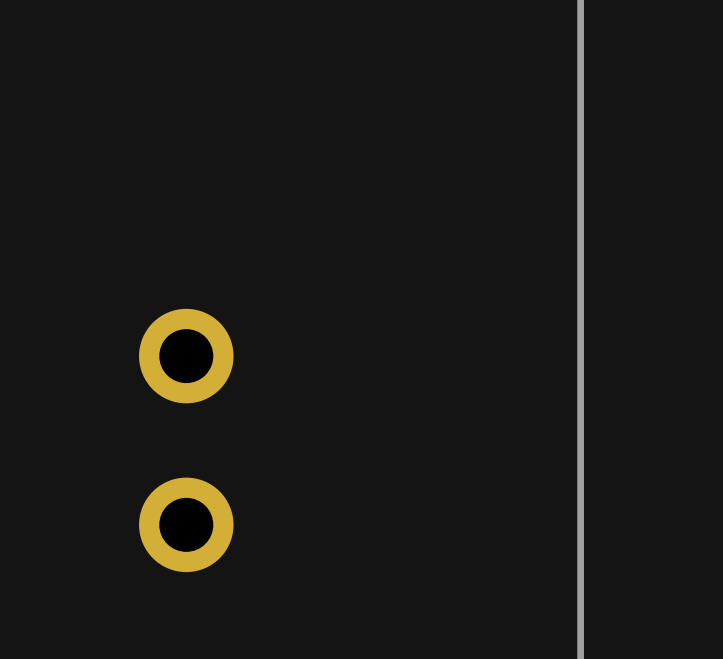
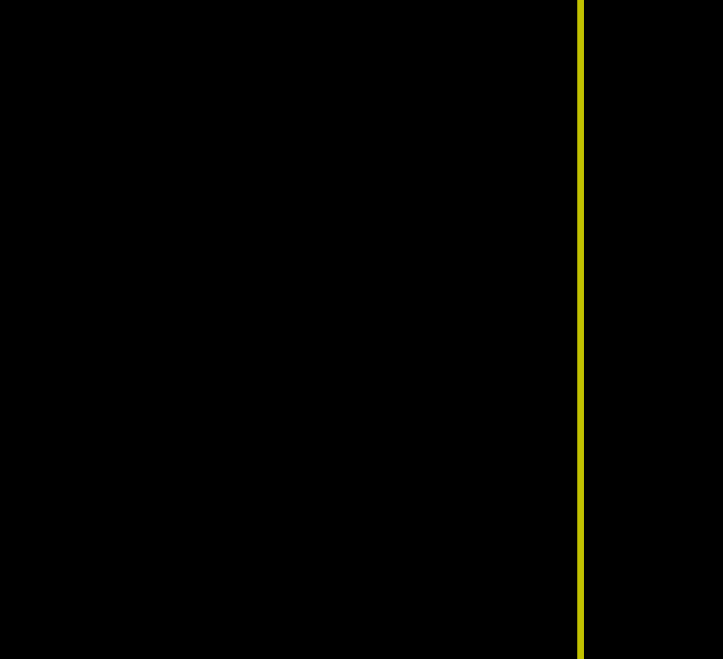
part: (186, 440) -> none

